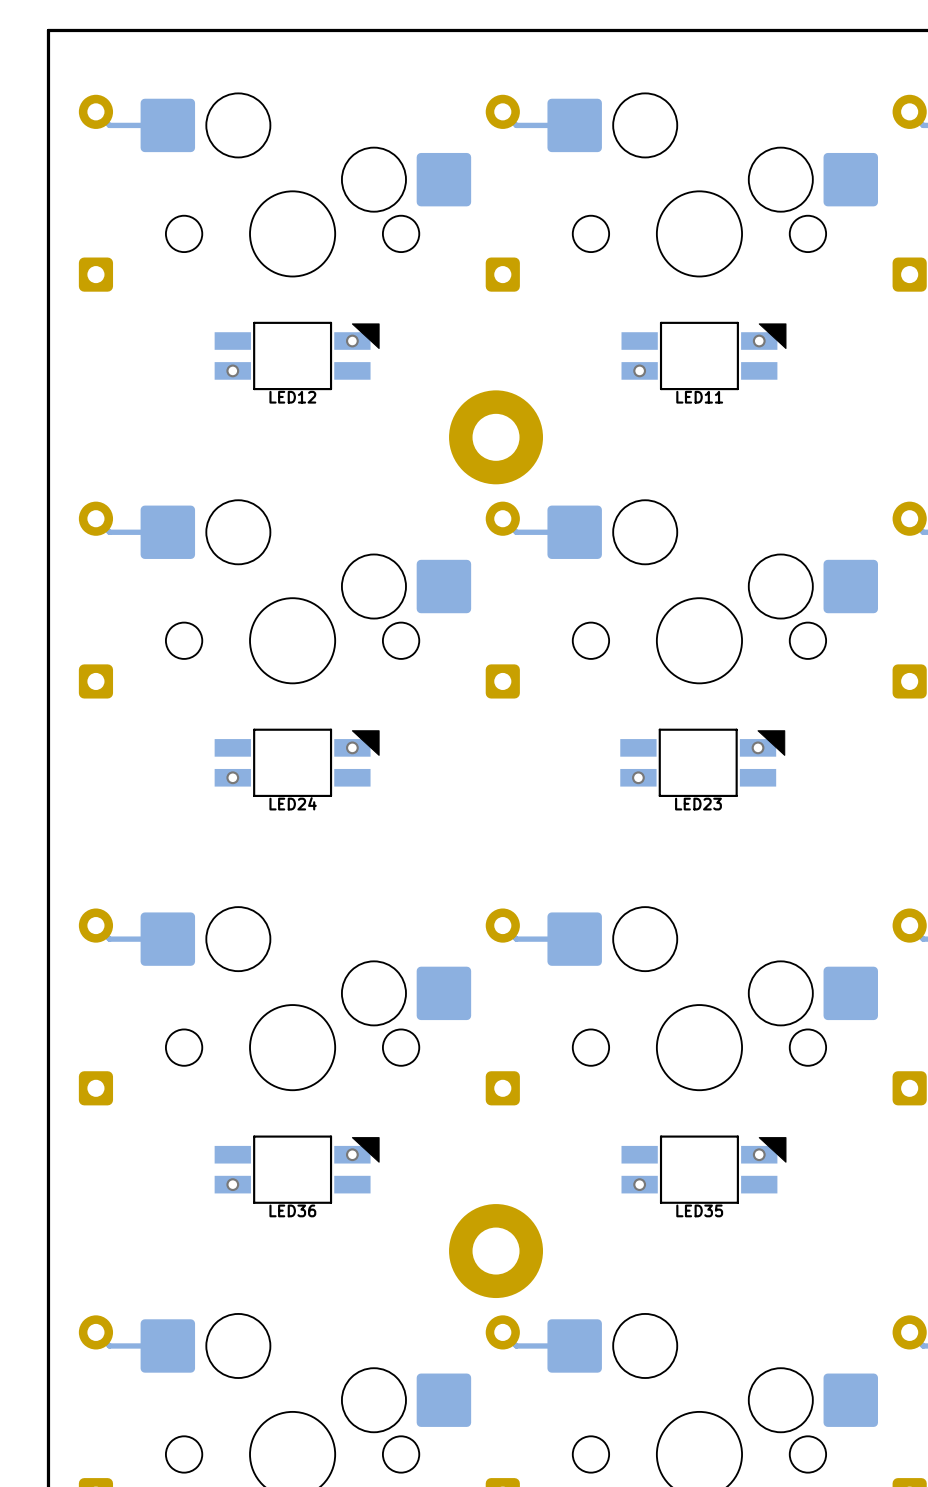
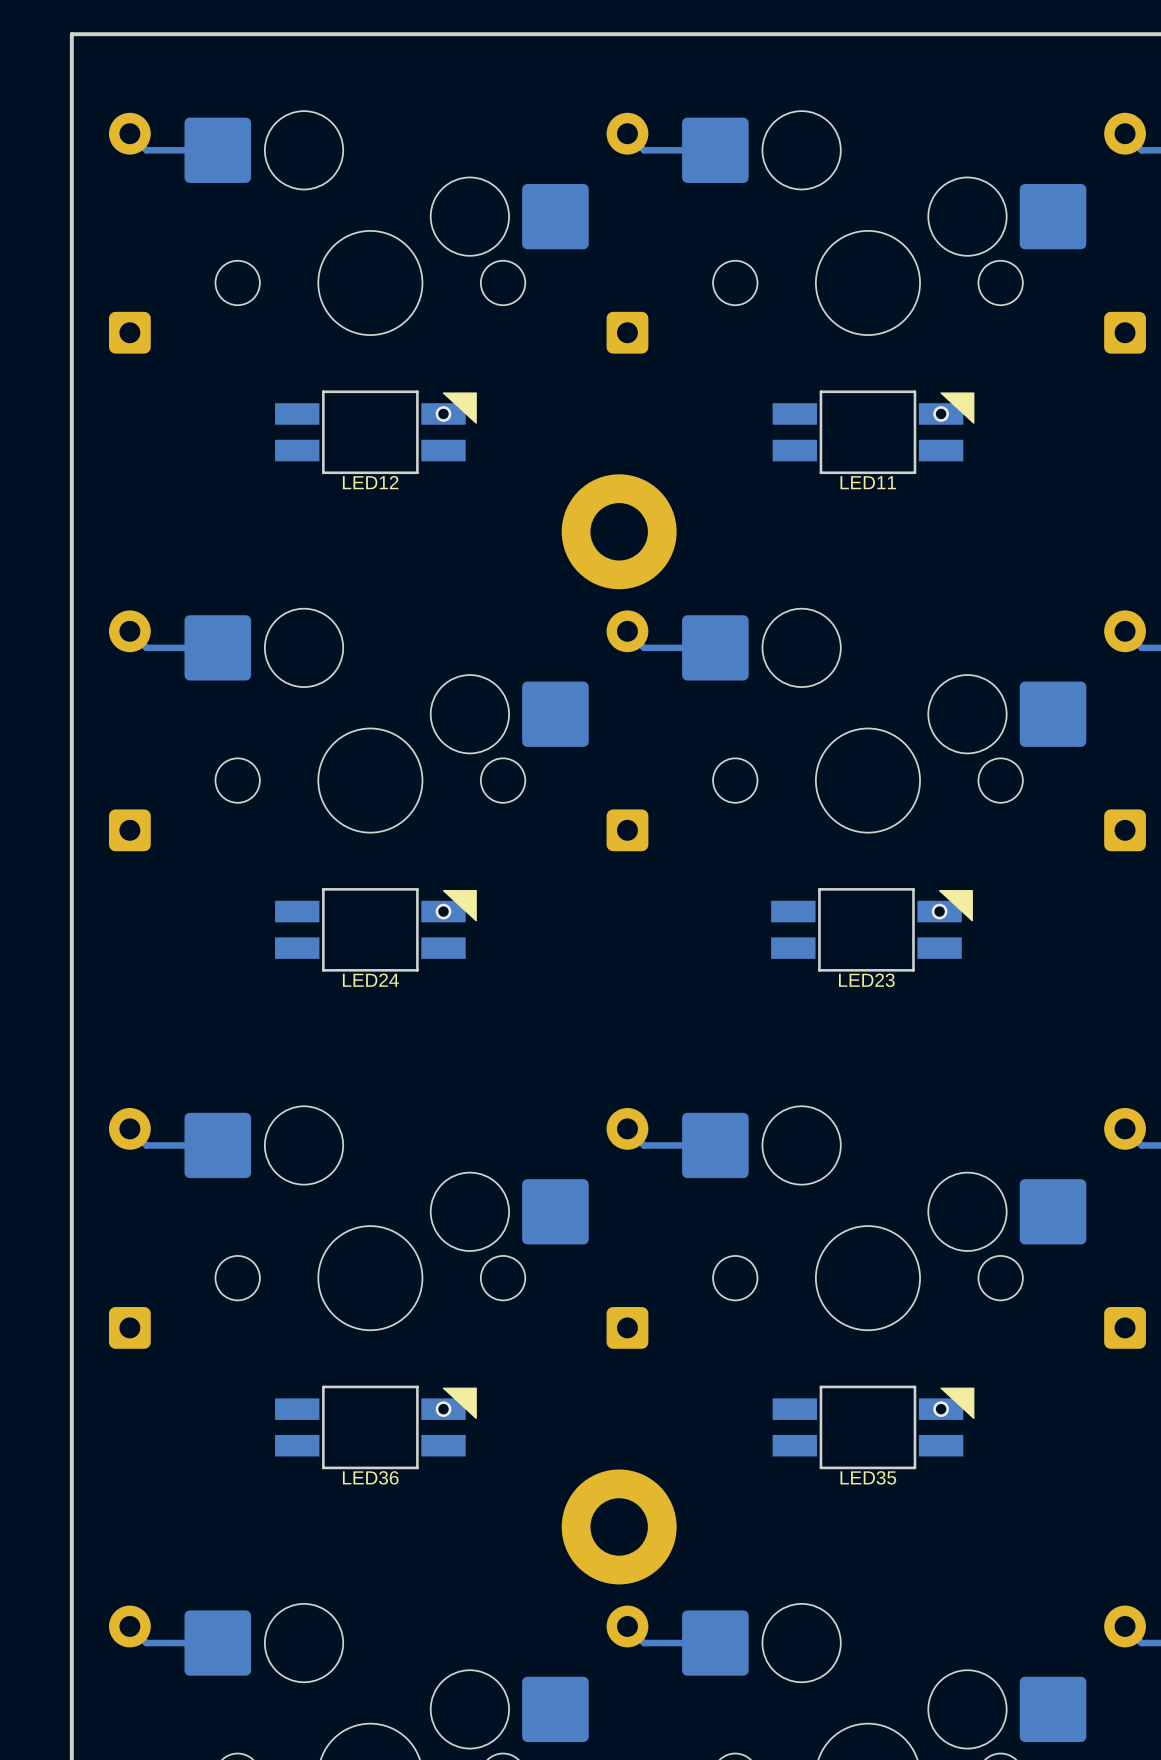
via: (232, 370) -> none
via: (639, 370) -> none
via: (232, 777) -> none
via: (638, 777) -> none
via: (232, 1184) -> none
via: (639, 1184) -> none

